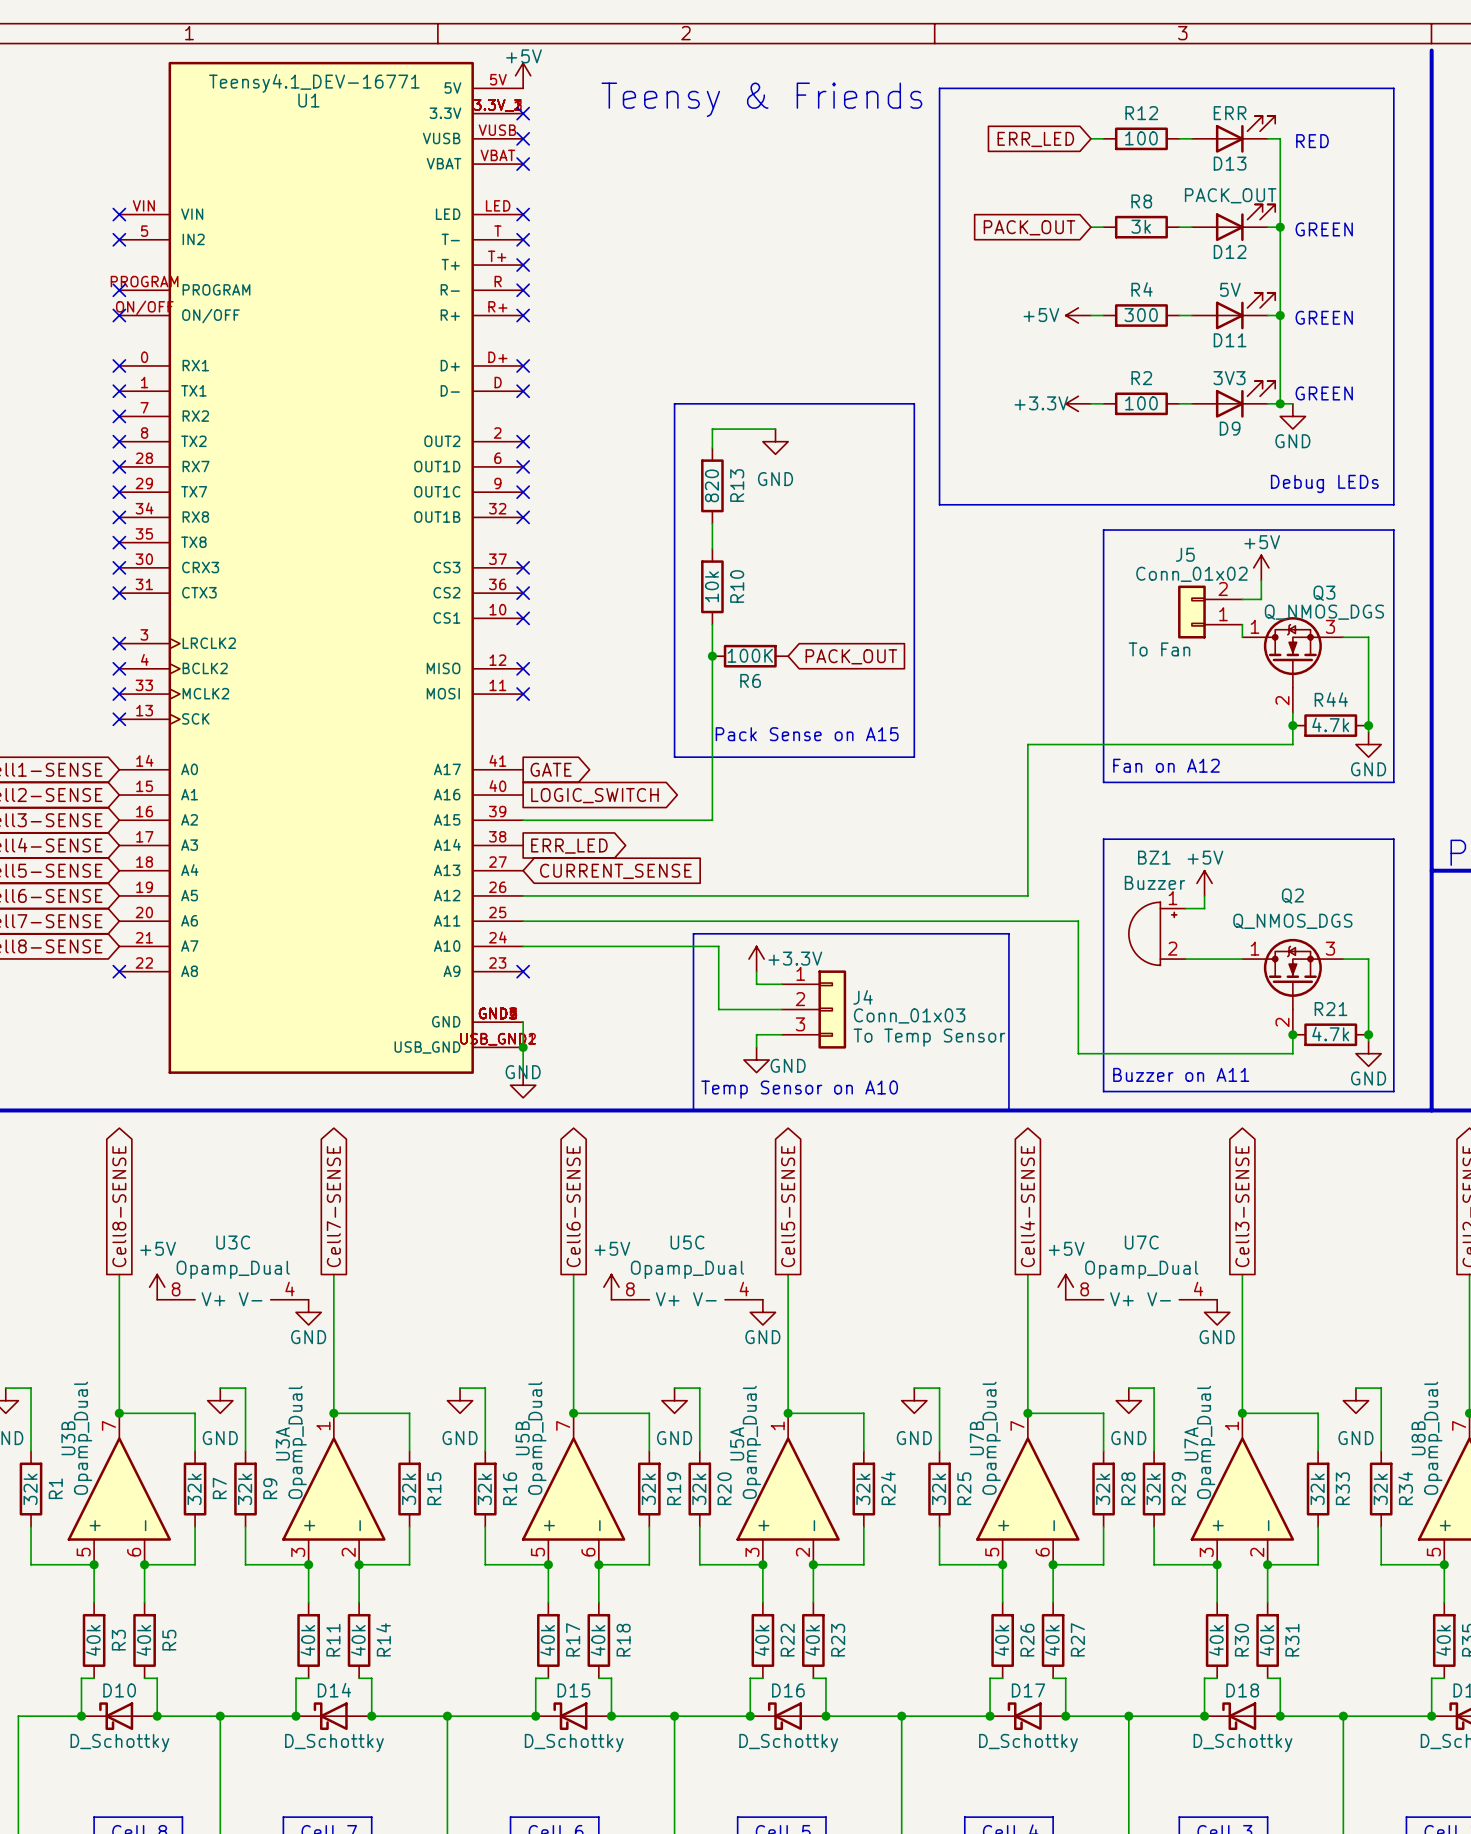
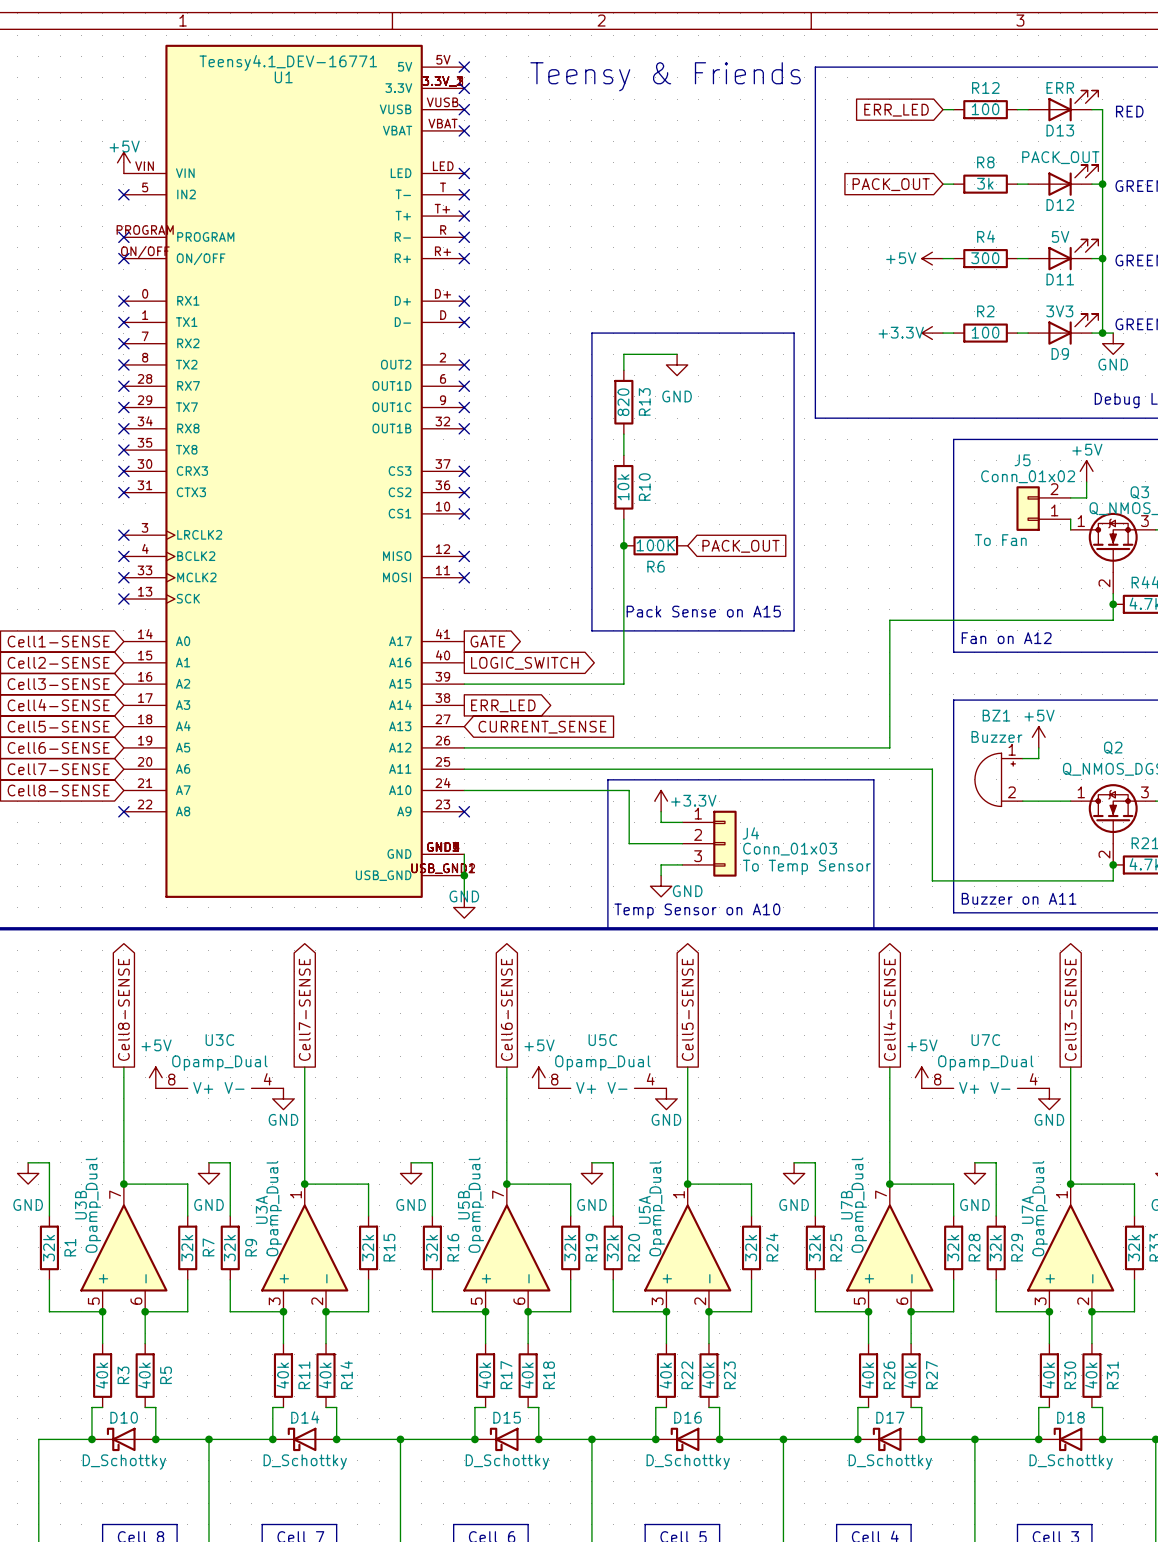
power symbol: +5V (523, 75) -> none
no-connect mark: none -> (464, 67)
power symbol: none -> +5V (123, 162)
no-connect mark: (119, 214) -> none

